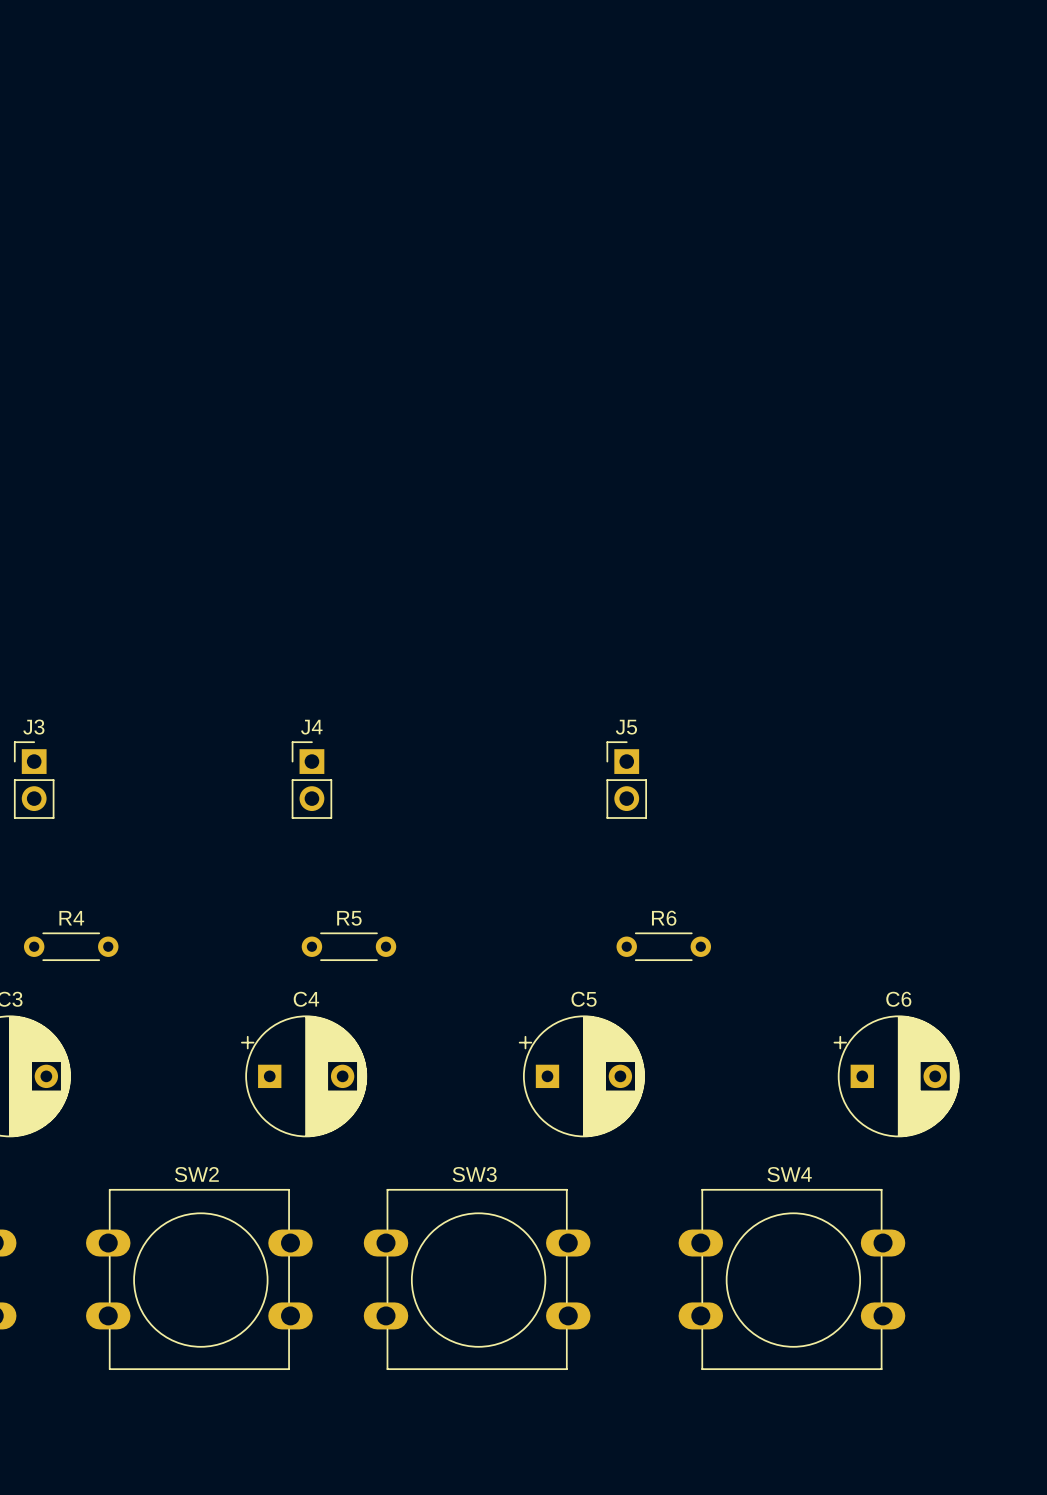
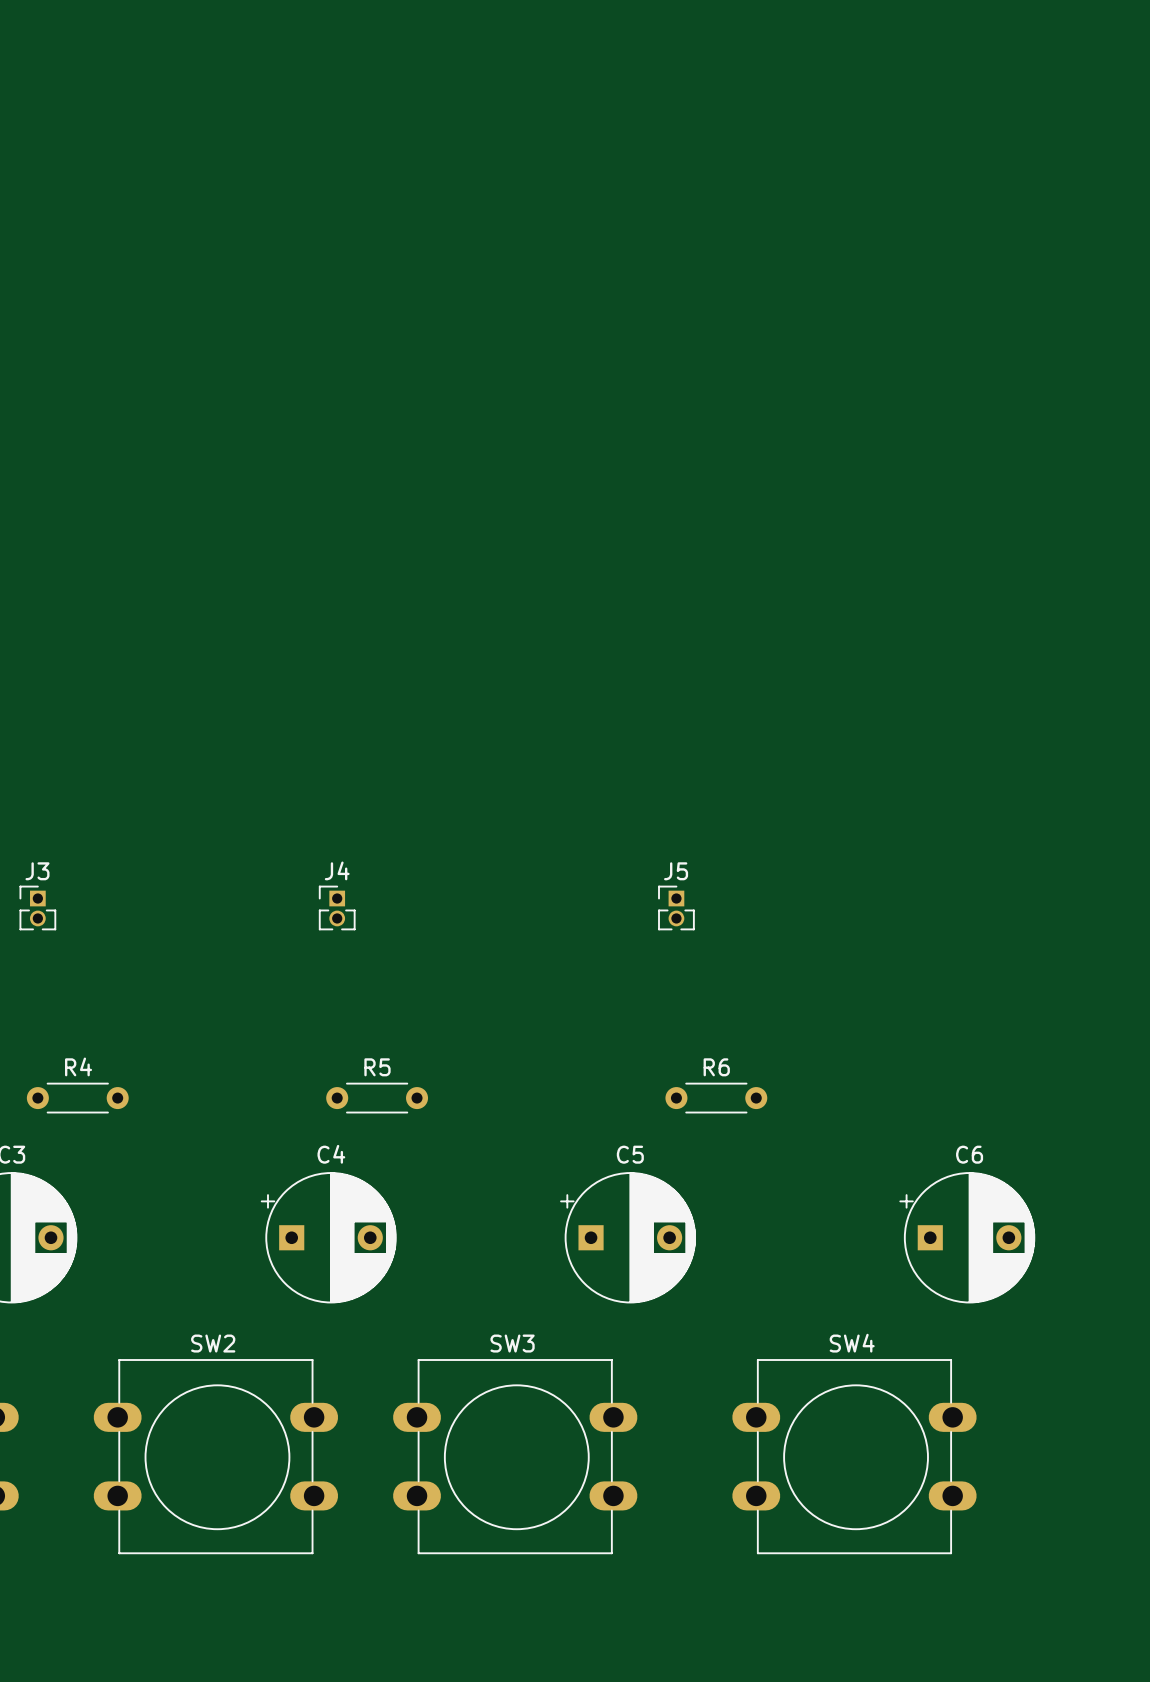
J3 footprint: [13, 741, 55, 819] -> [19, 885, 57, 931]
J4 footprint: [291, 741, 333, 819] -> [318, 885, 356, 931]
J5 footprint: [606, 741, 648, 819] -> [658, 885, 695, 931]

